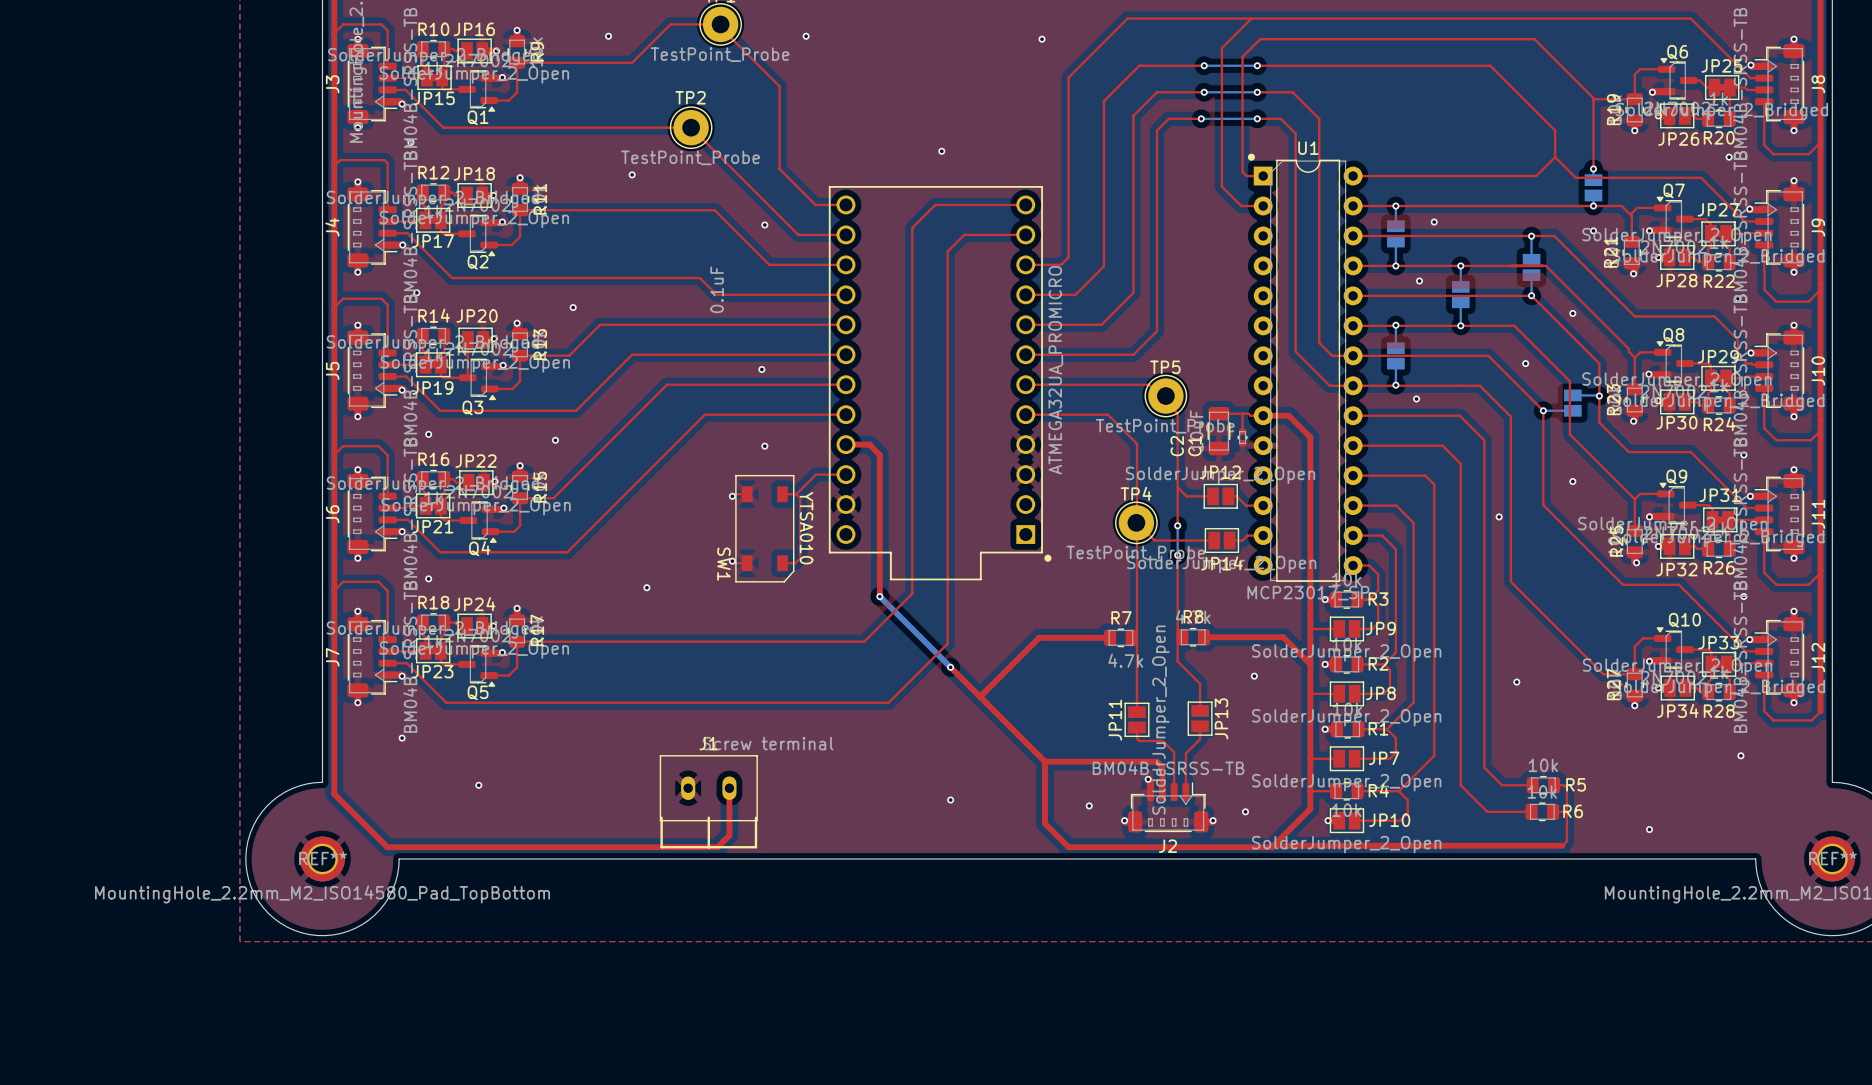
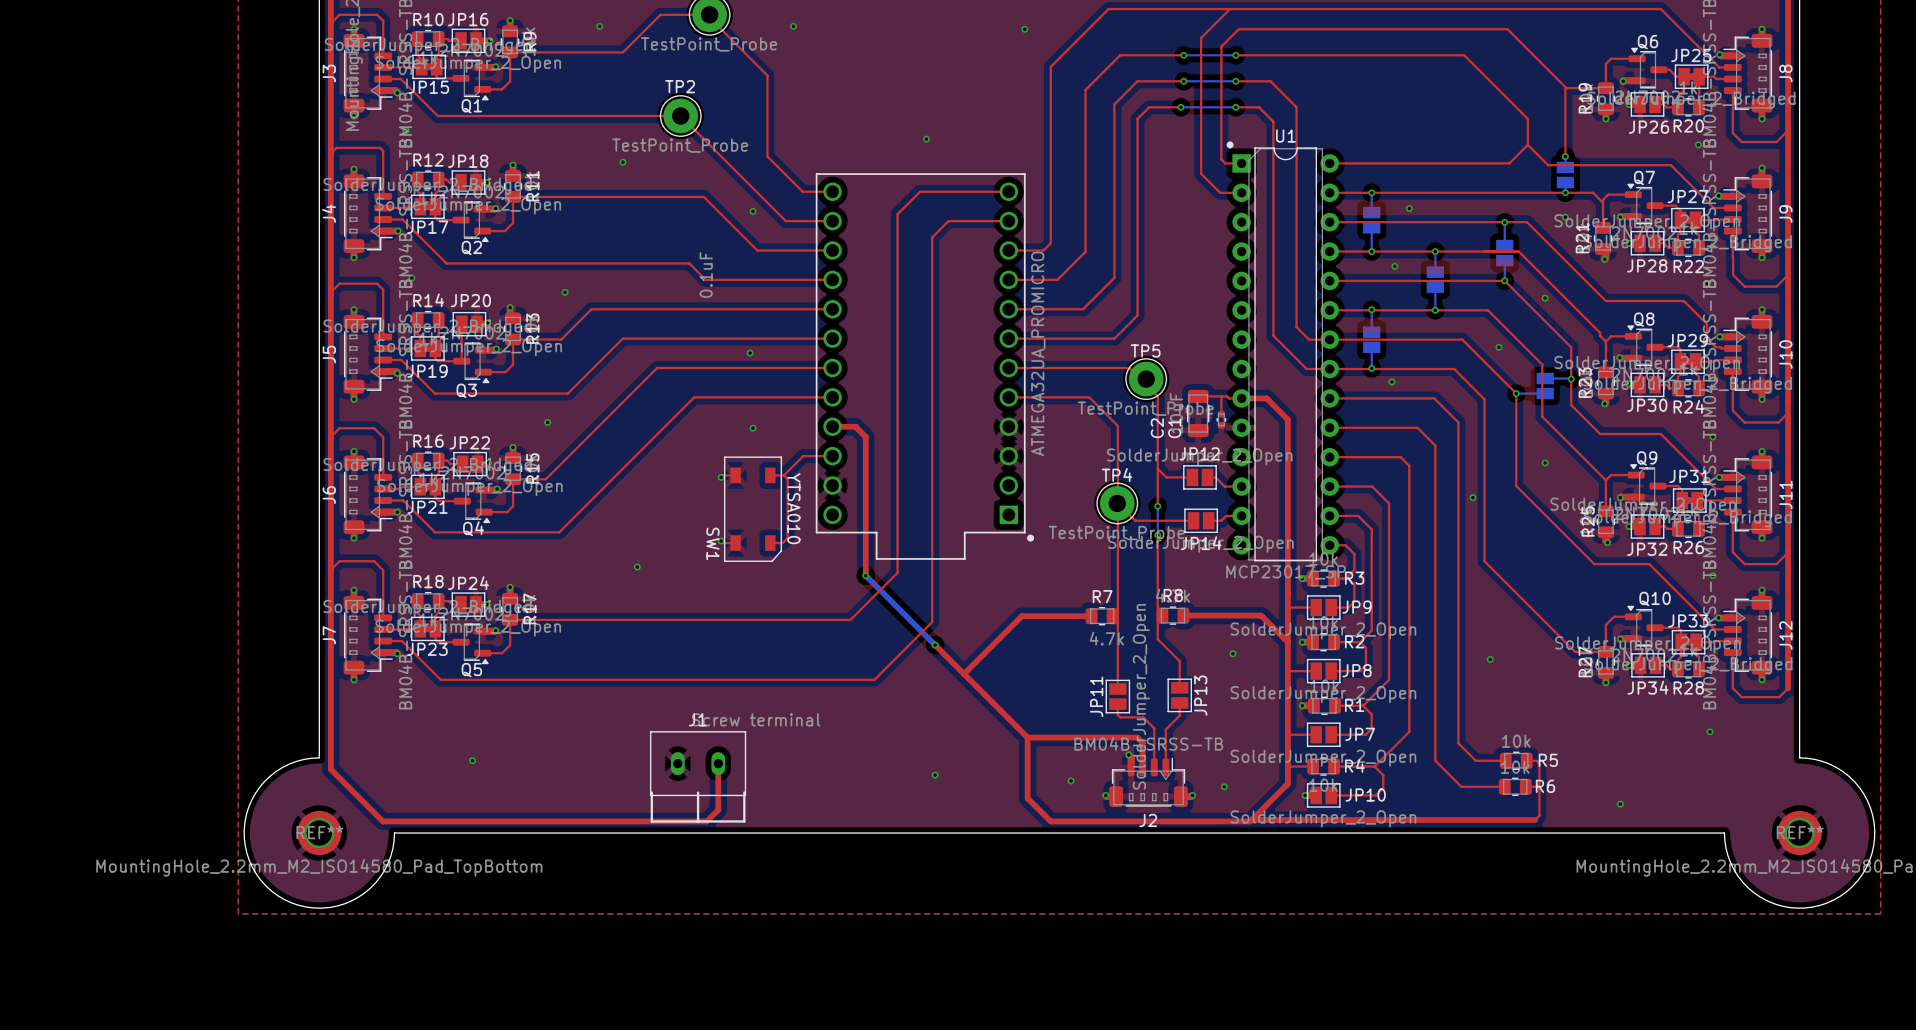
via: (428, 434) -> none
via: (428, 578) -> none
via: (402, 738) -> none

